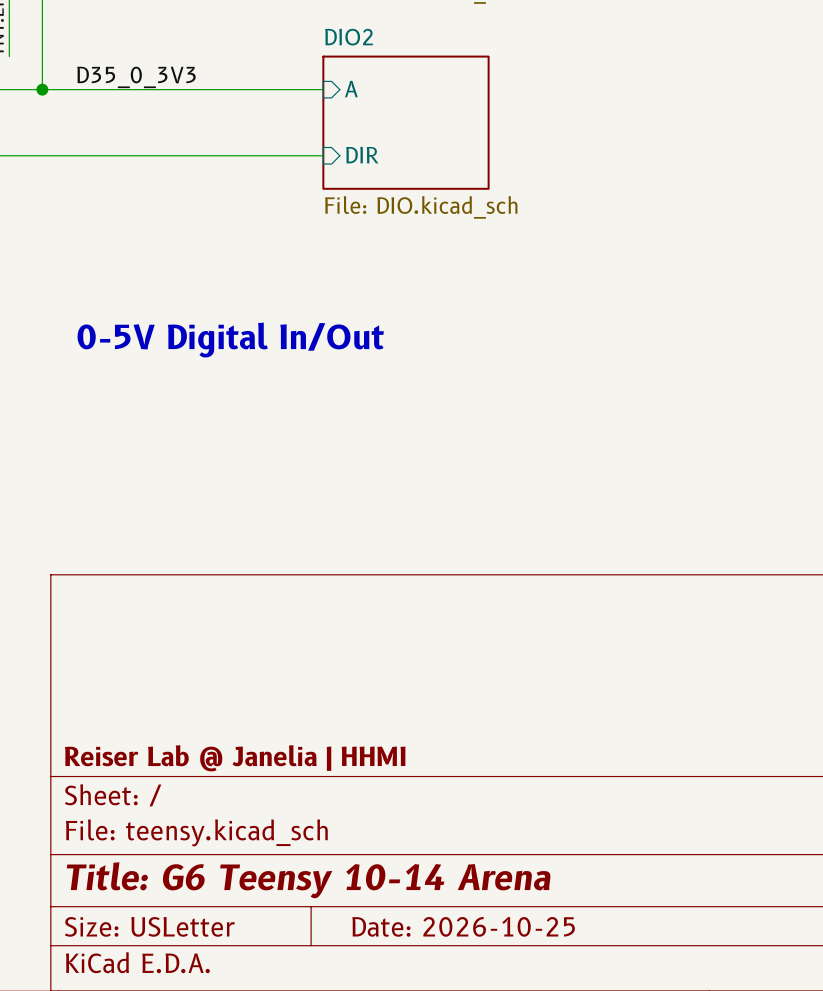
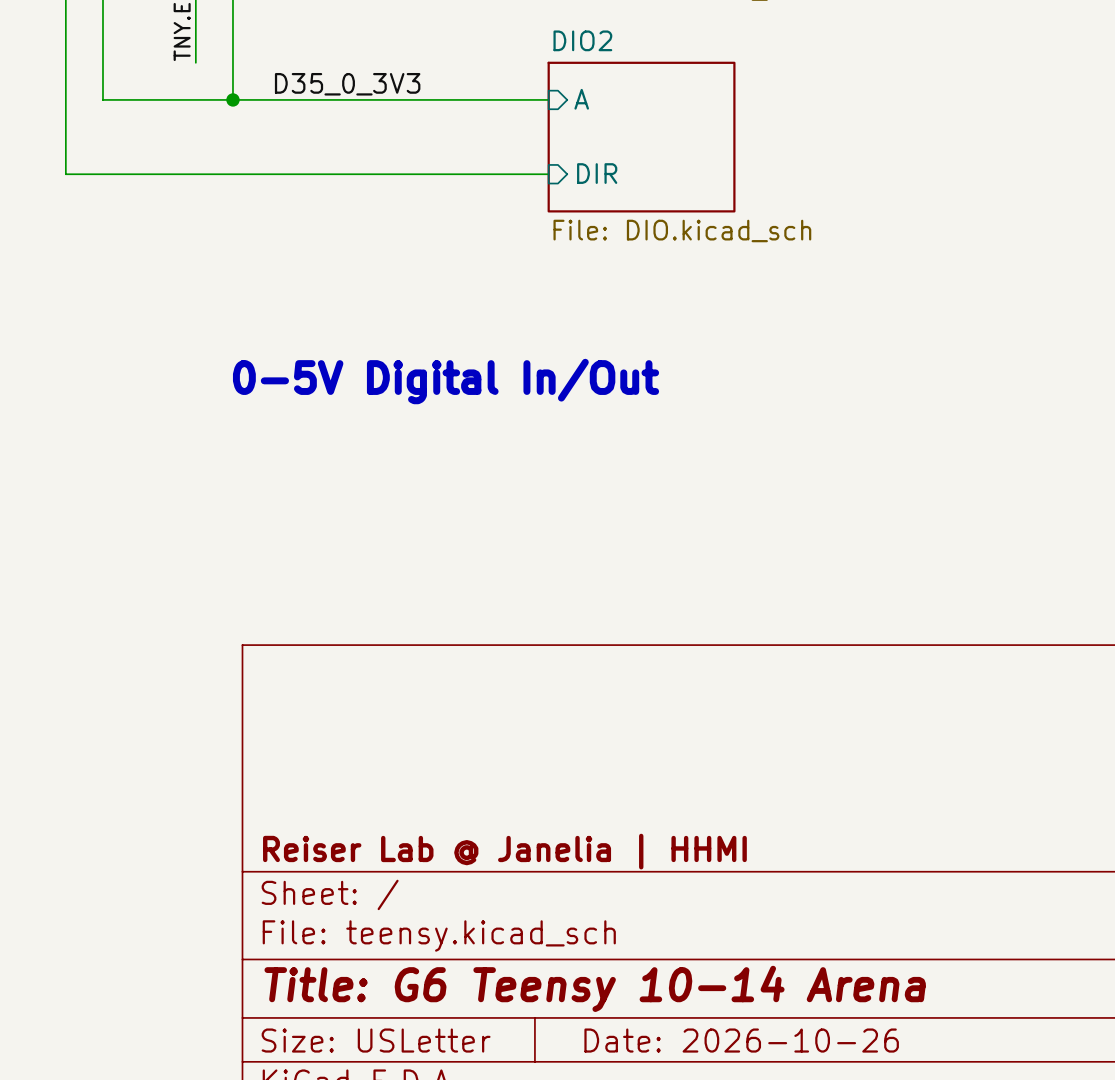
title block: Date: 2026-10-25 (463, 926) -> Date: 2026-10-26 (741, 1040)

